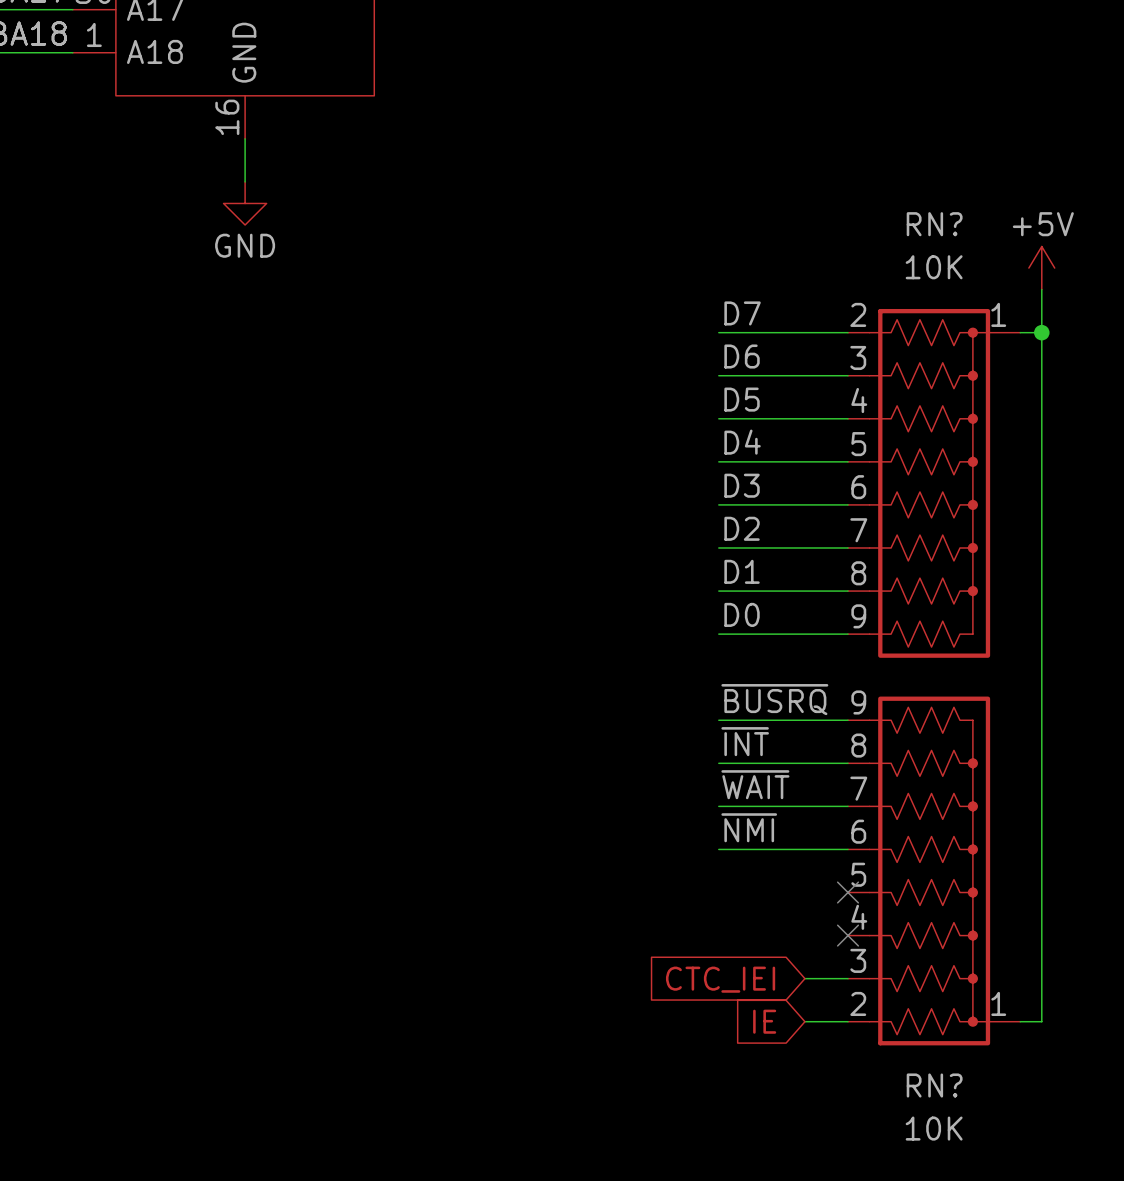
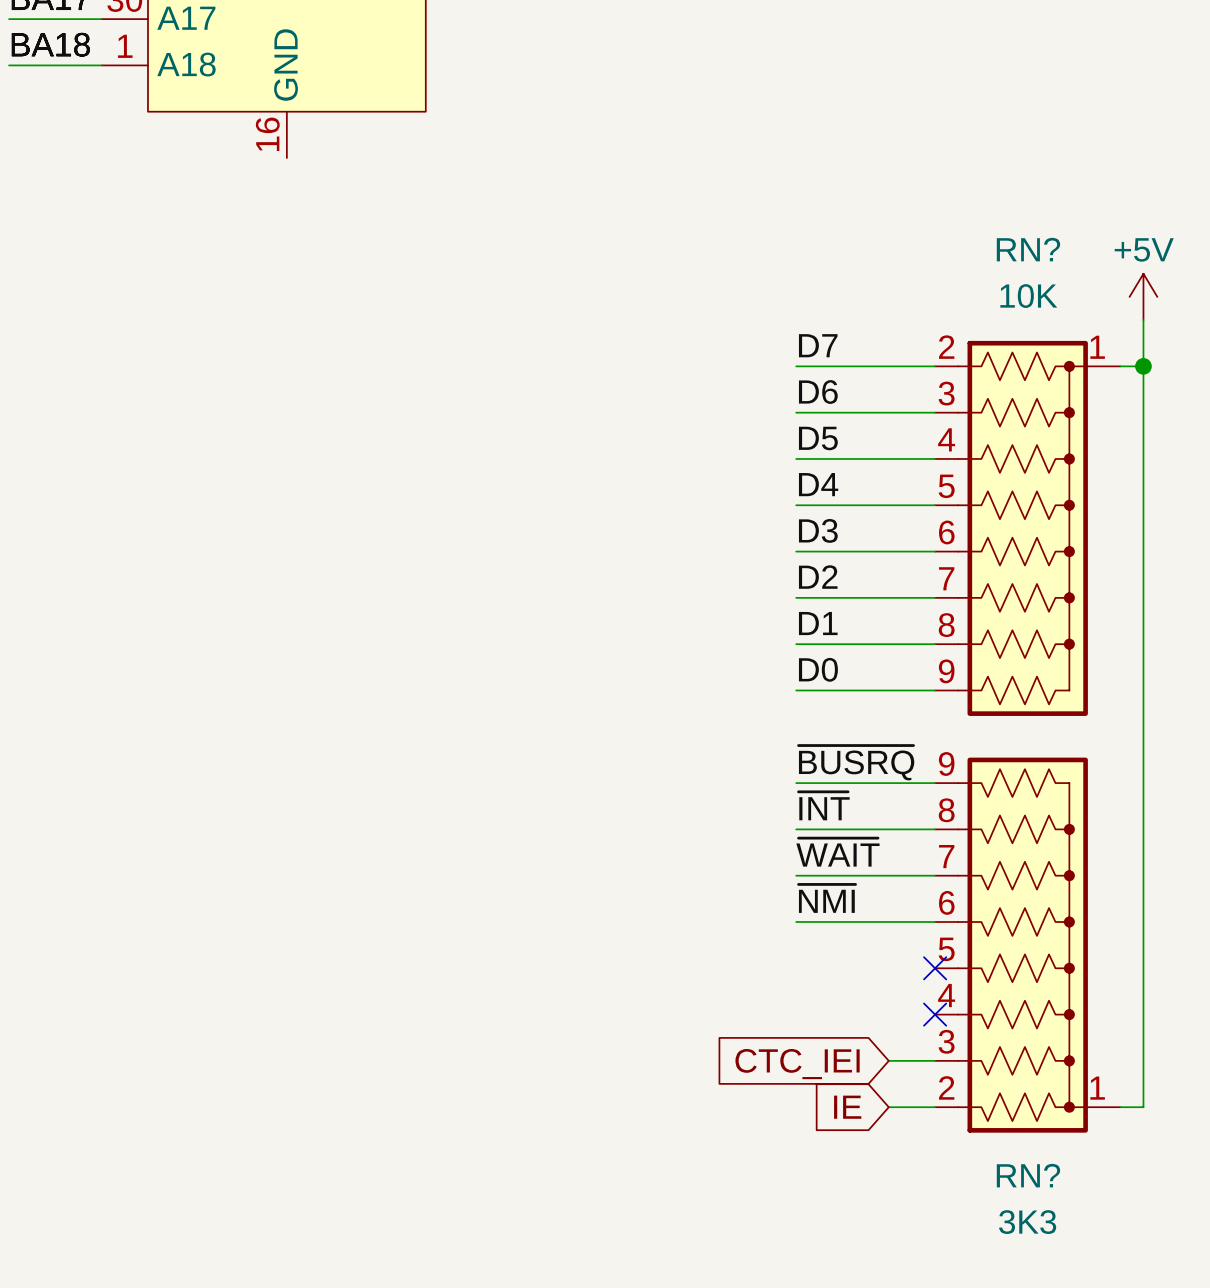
wire: (245, 138) (245, 181) -> none
power symbol: GND (245, 203) -> none
RN? value: 10K (934, 1128) -> 3K3 (1027, 1222)

